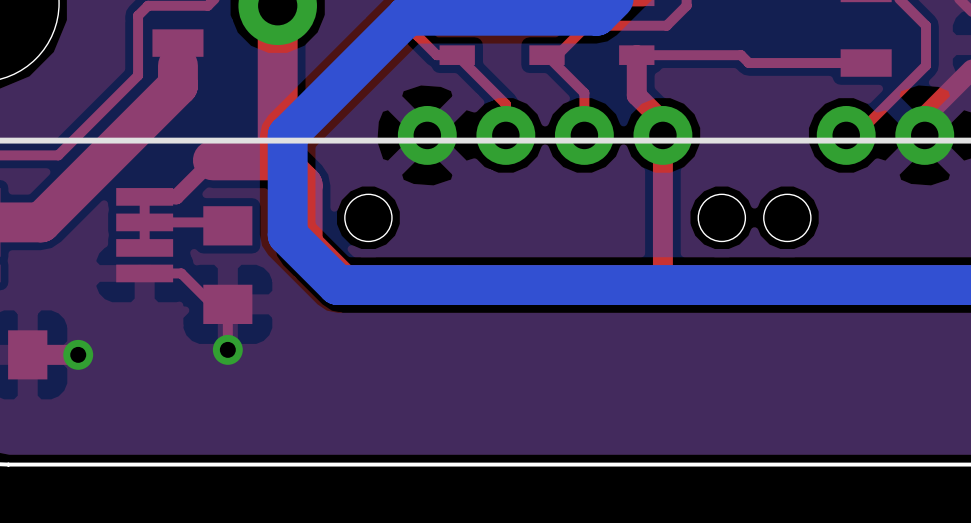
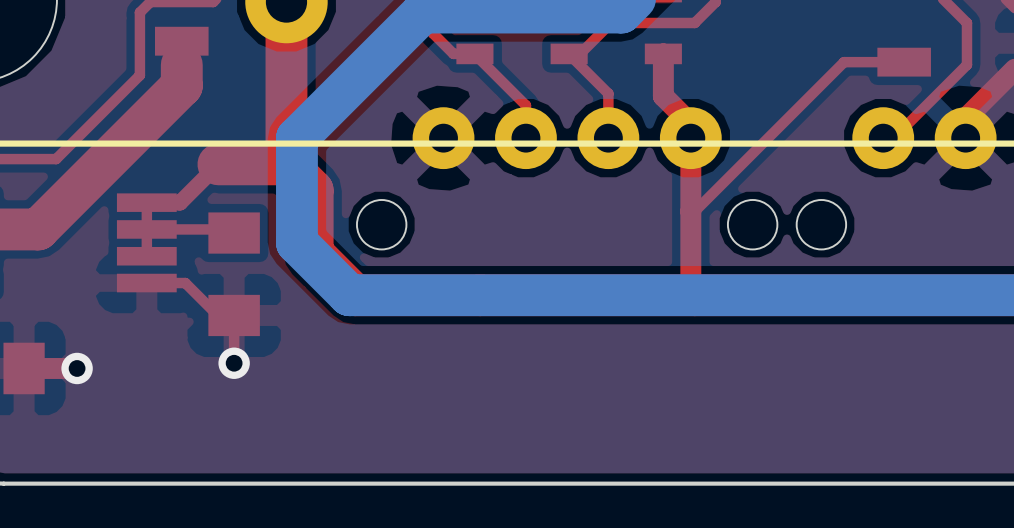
top track: (636, 55) (741, 55) (748, 63) (808, 63) -> (690, 211) (694, 211) (844, 62)

